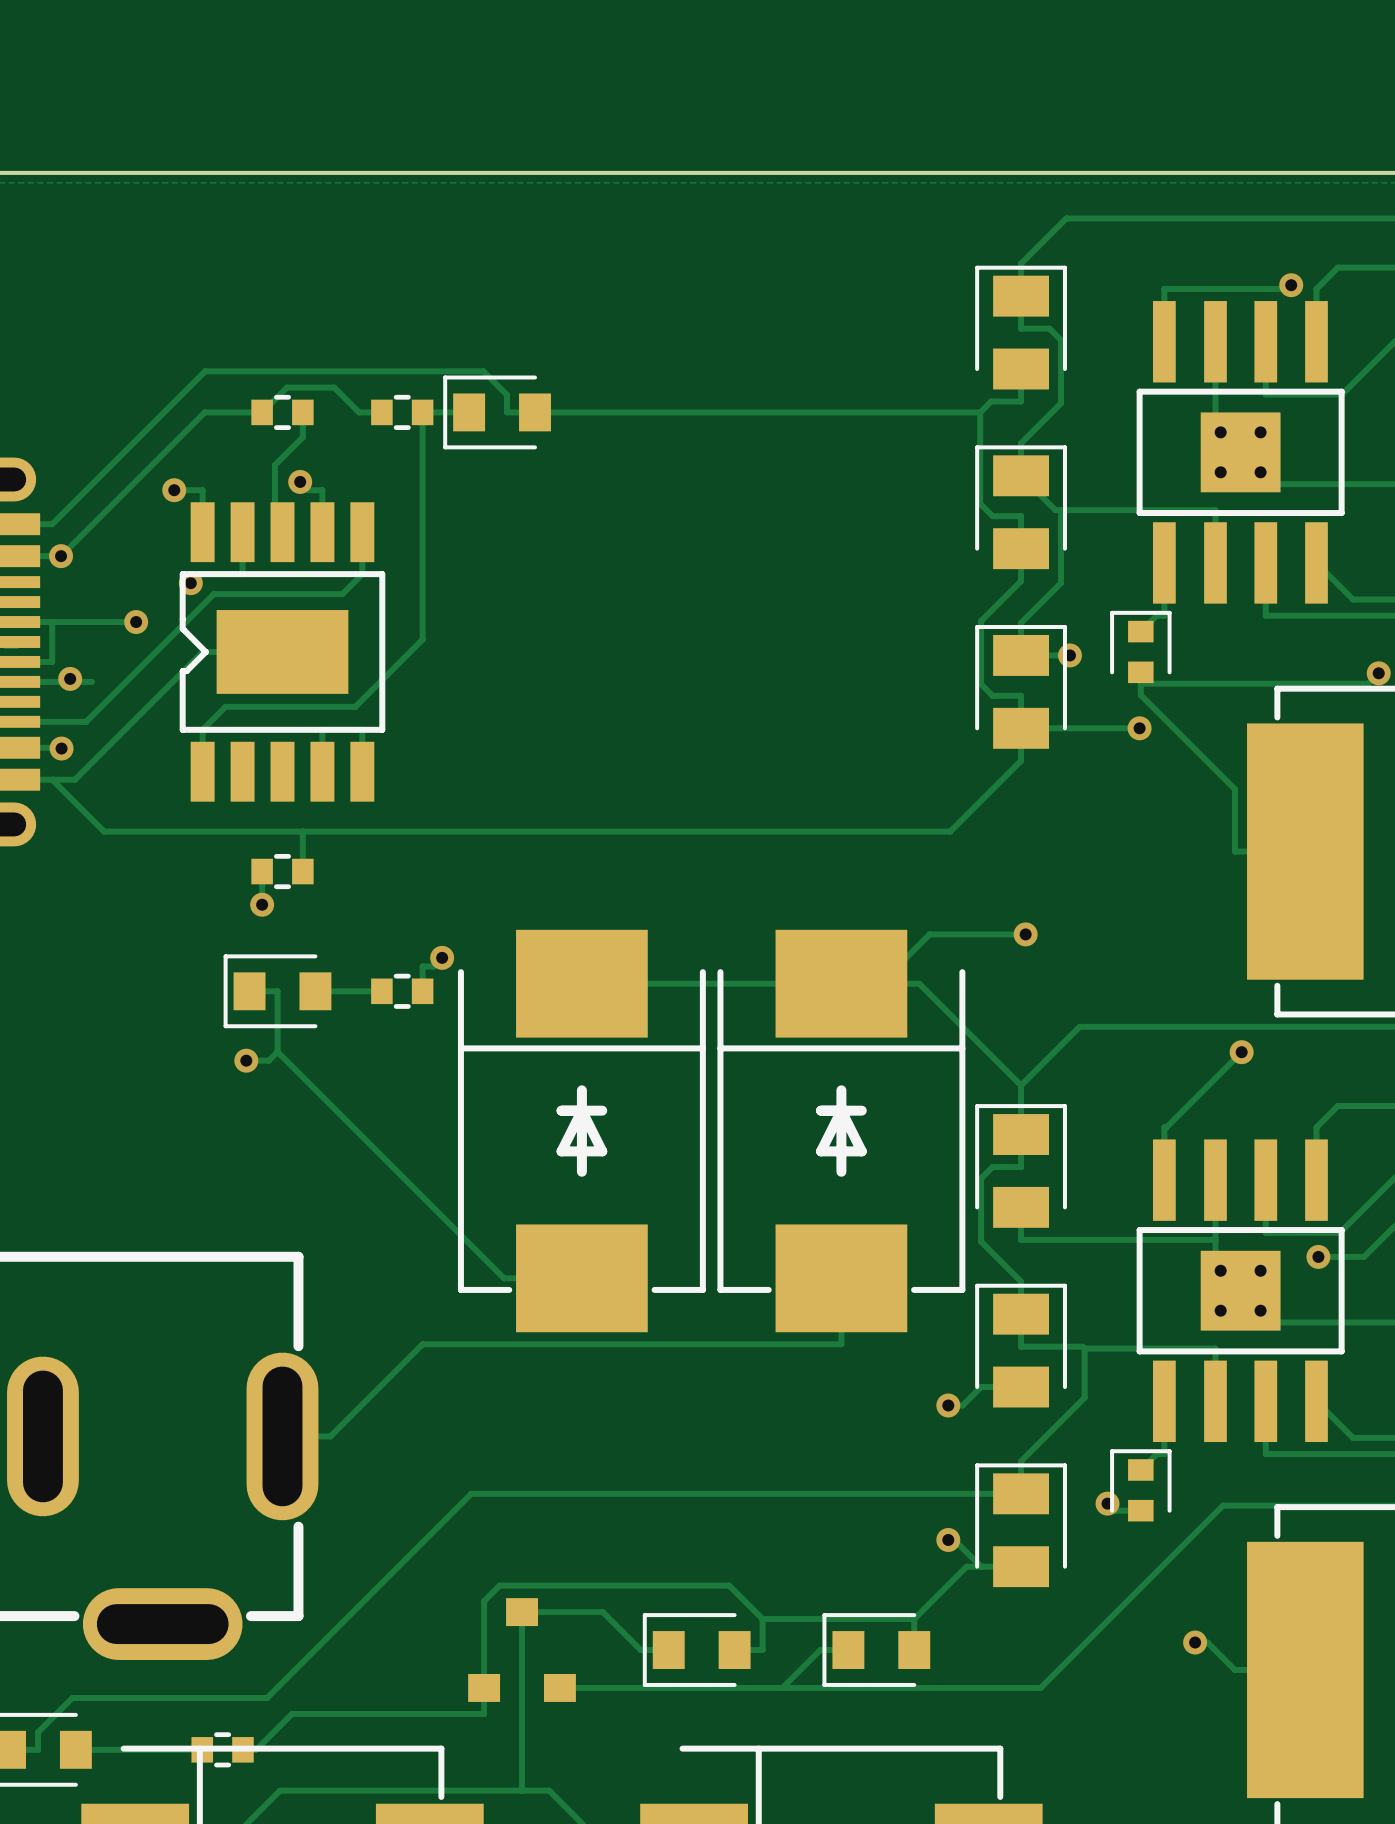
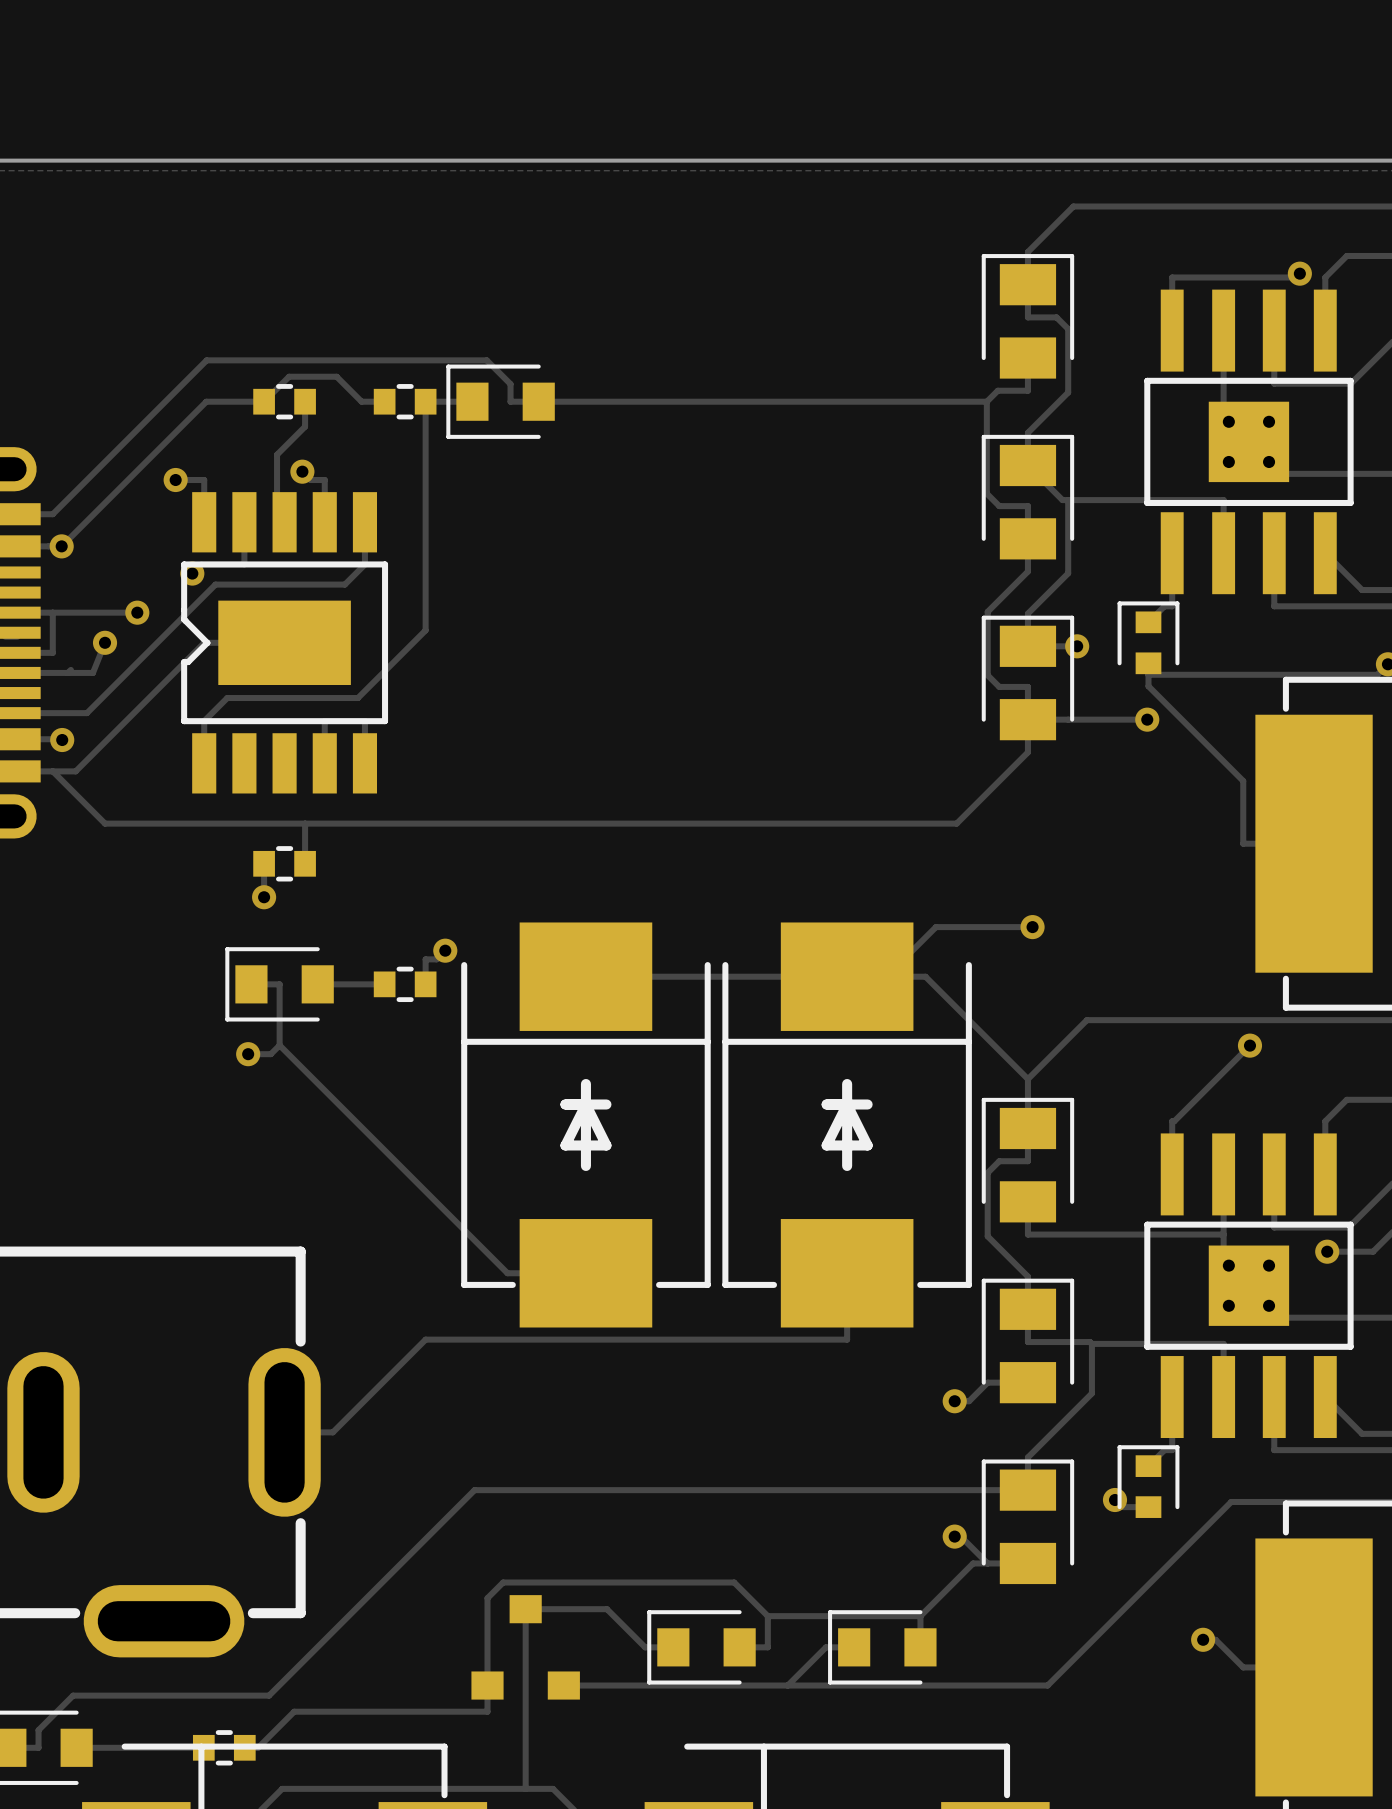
track: none -> (105, 642) (92, 672)
via position: (70, 678) -> (105, 642)

